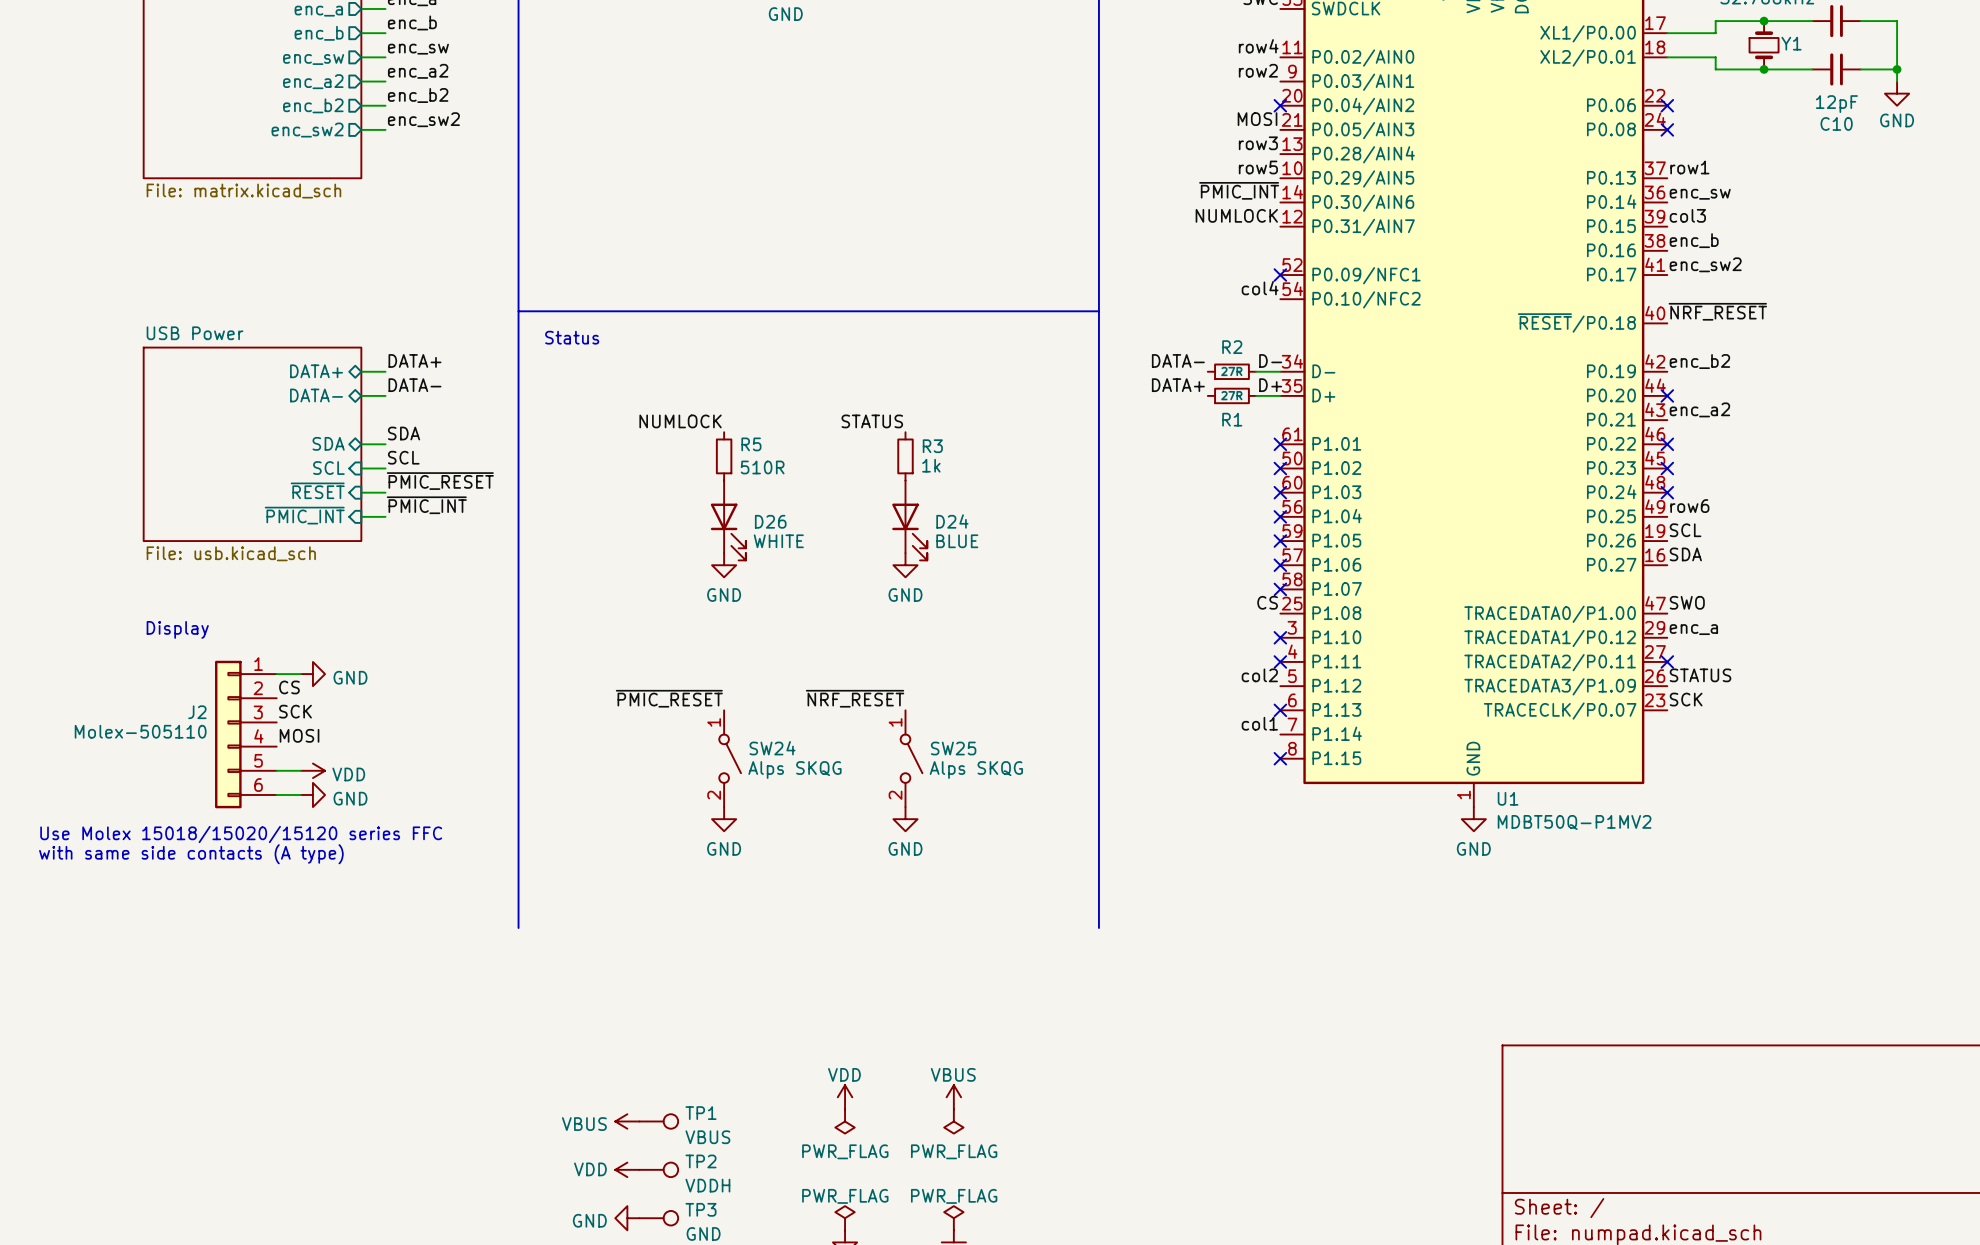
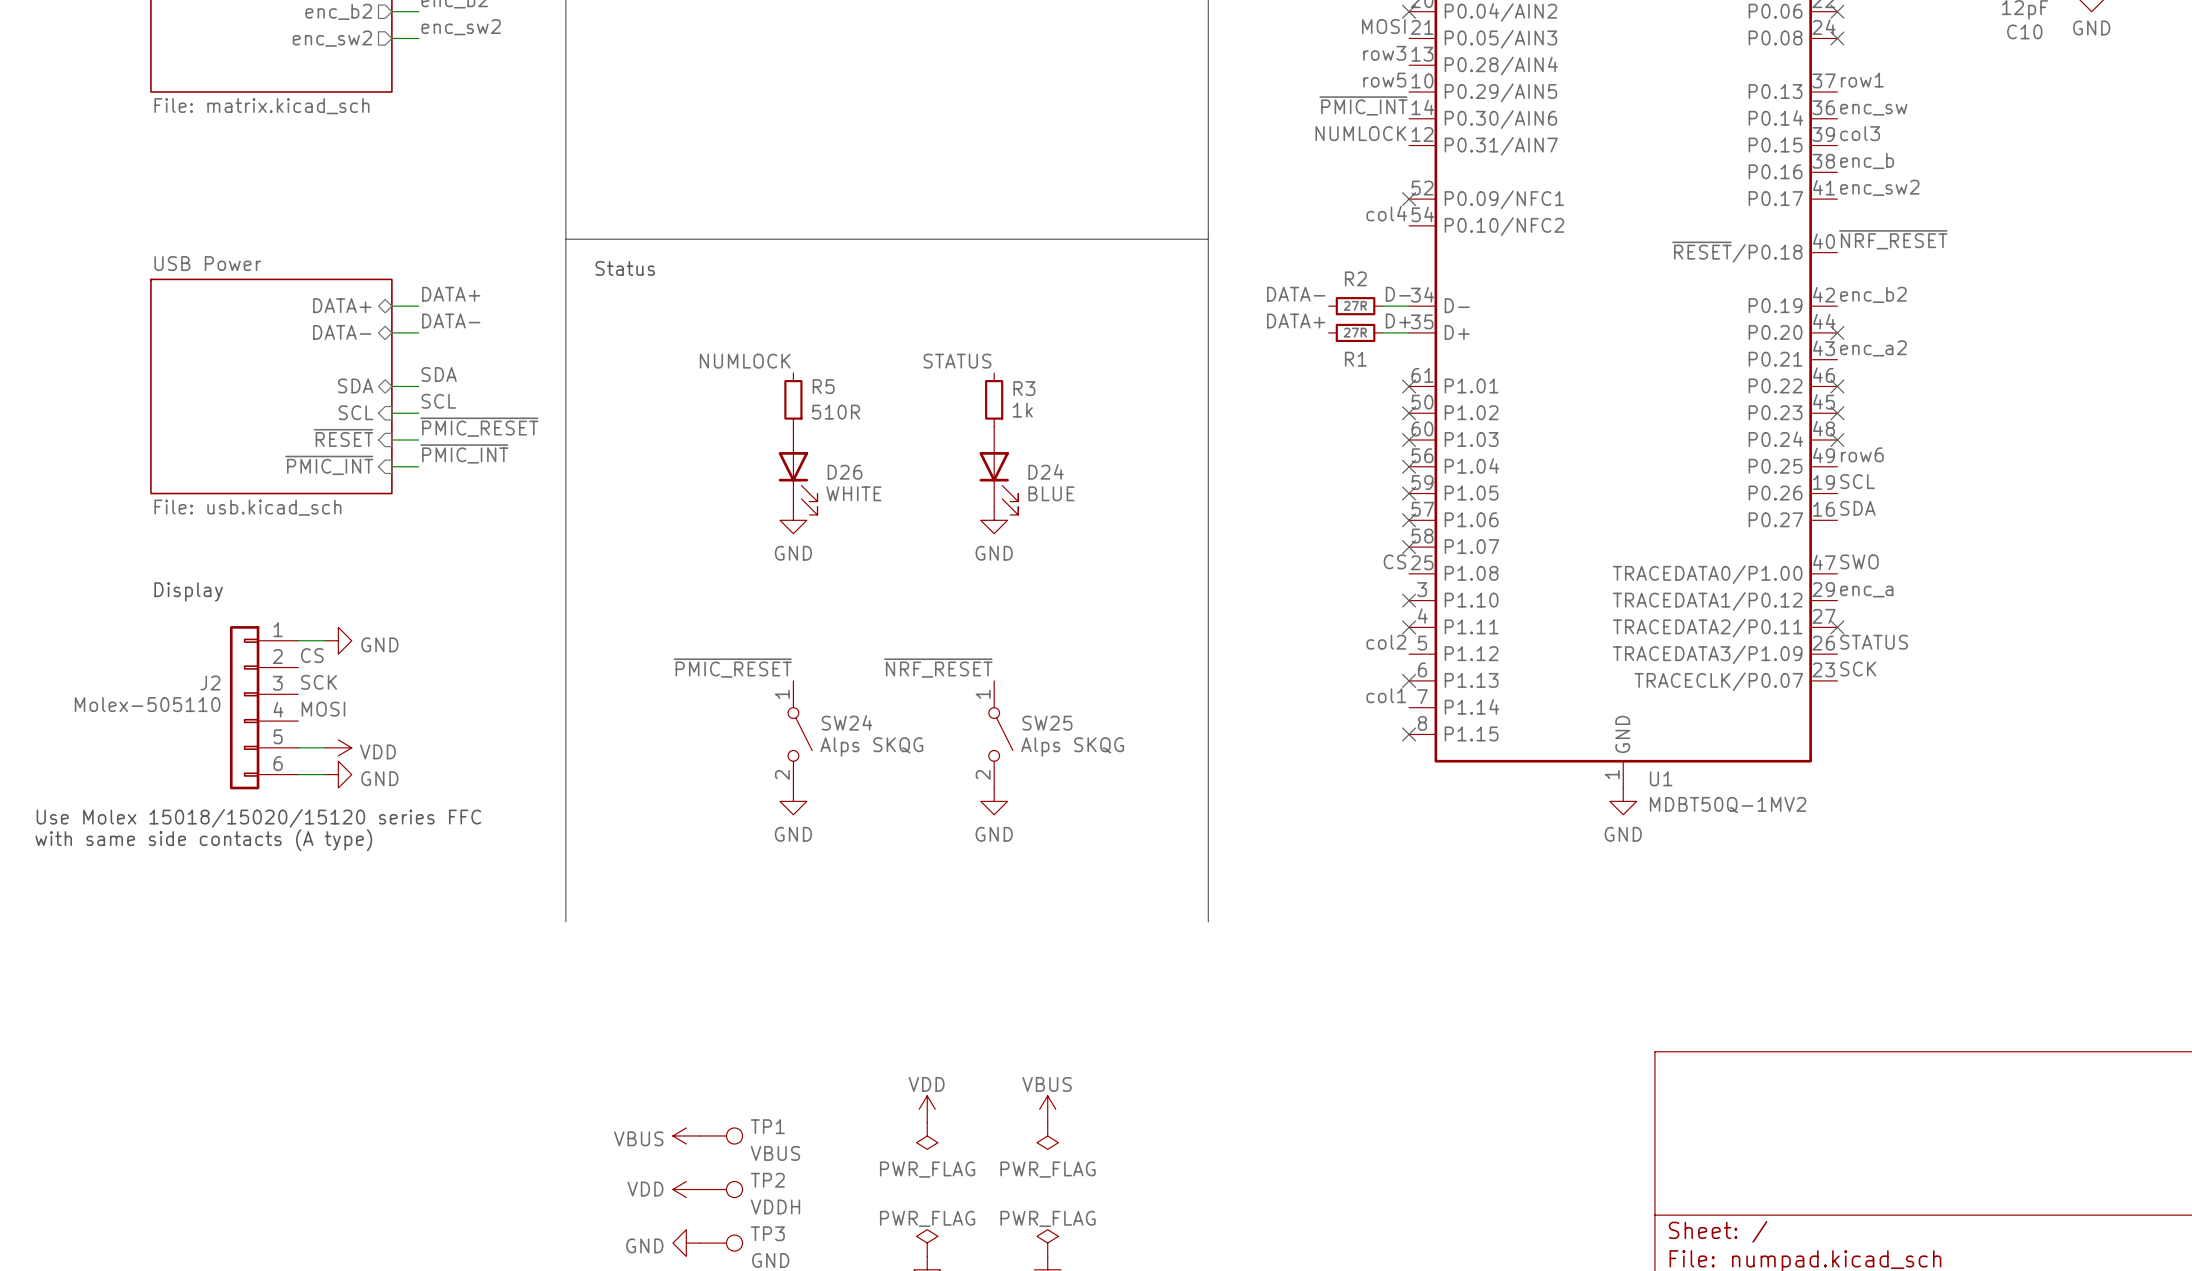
U1 value: MDBT50Q-P1MV2 (1574, 822) -> MDBT50Q-1MV2 (1728, 805)

